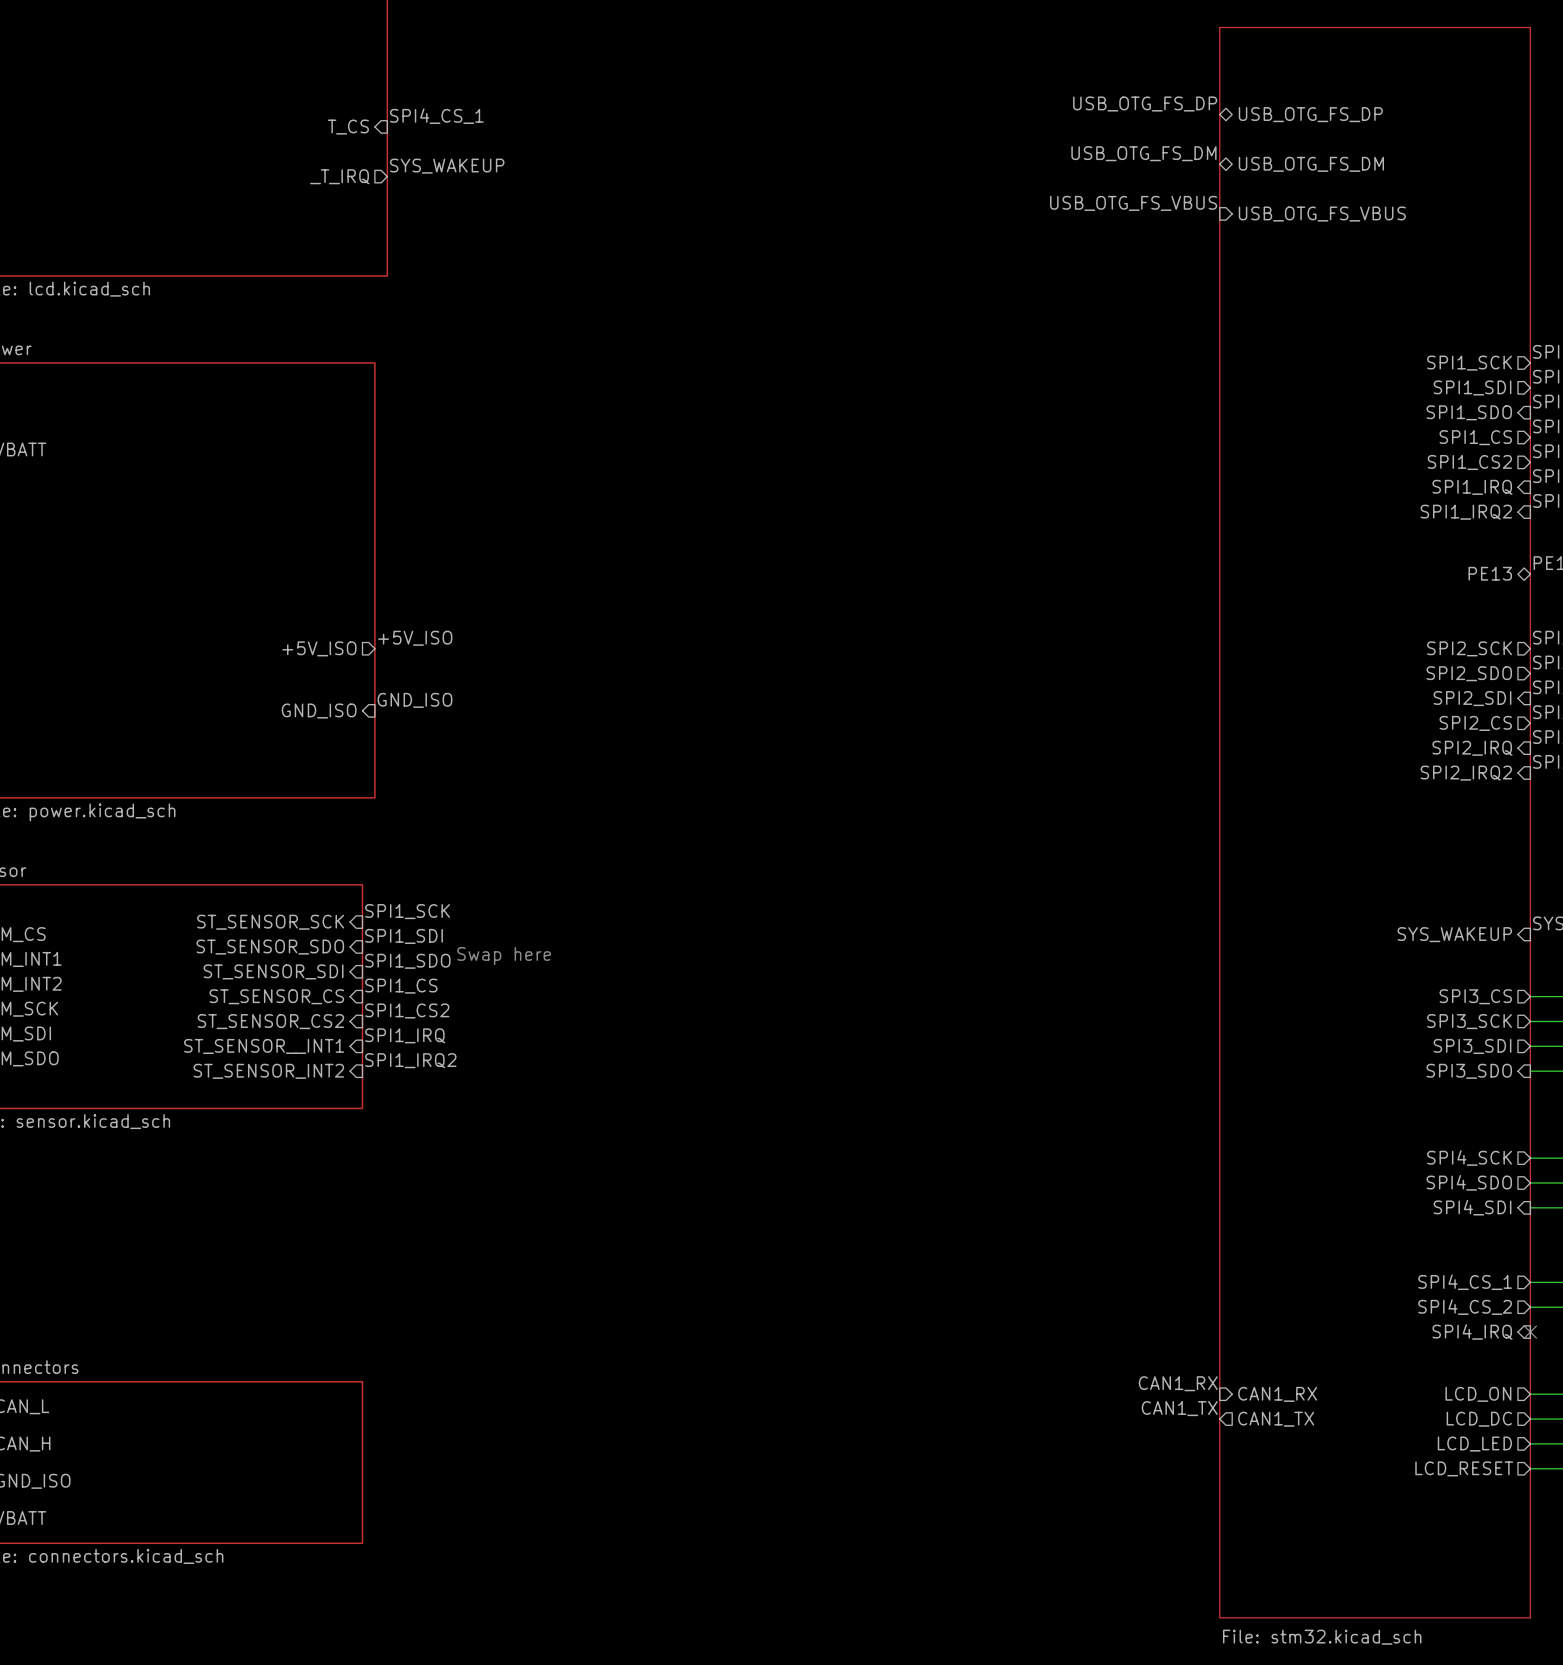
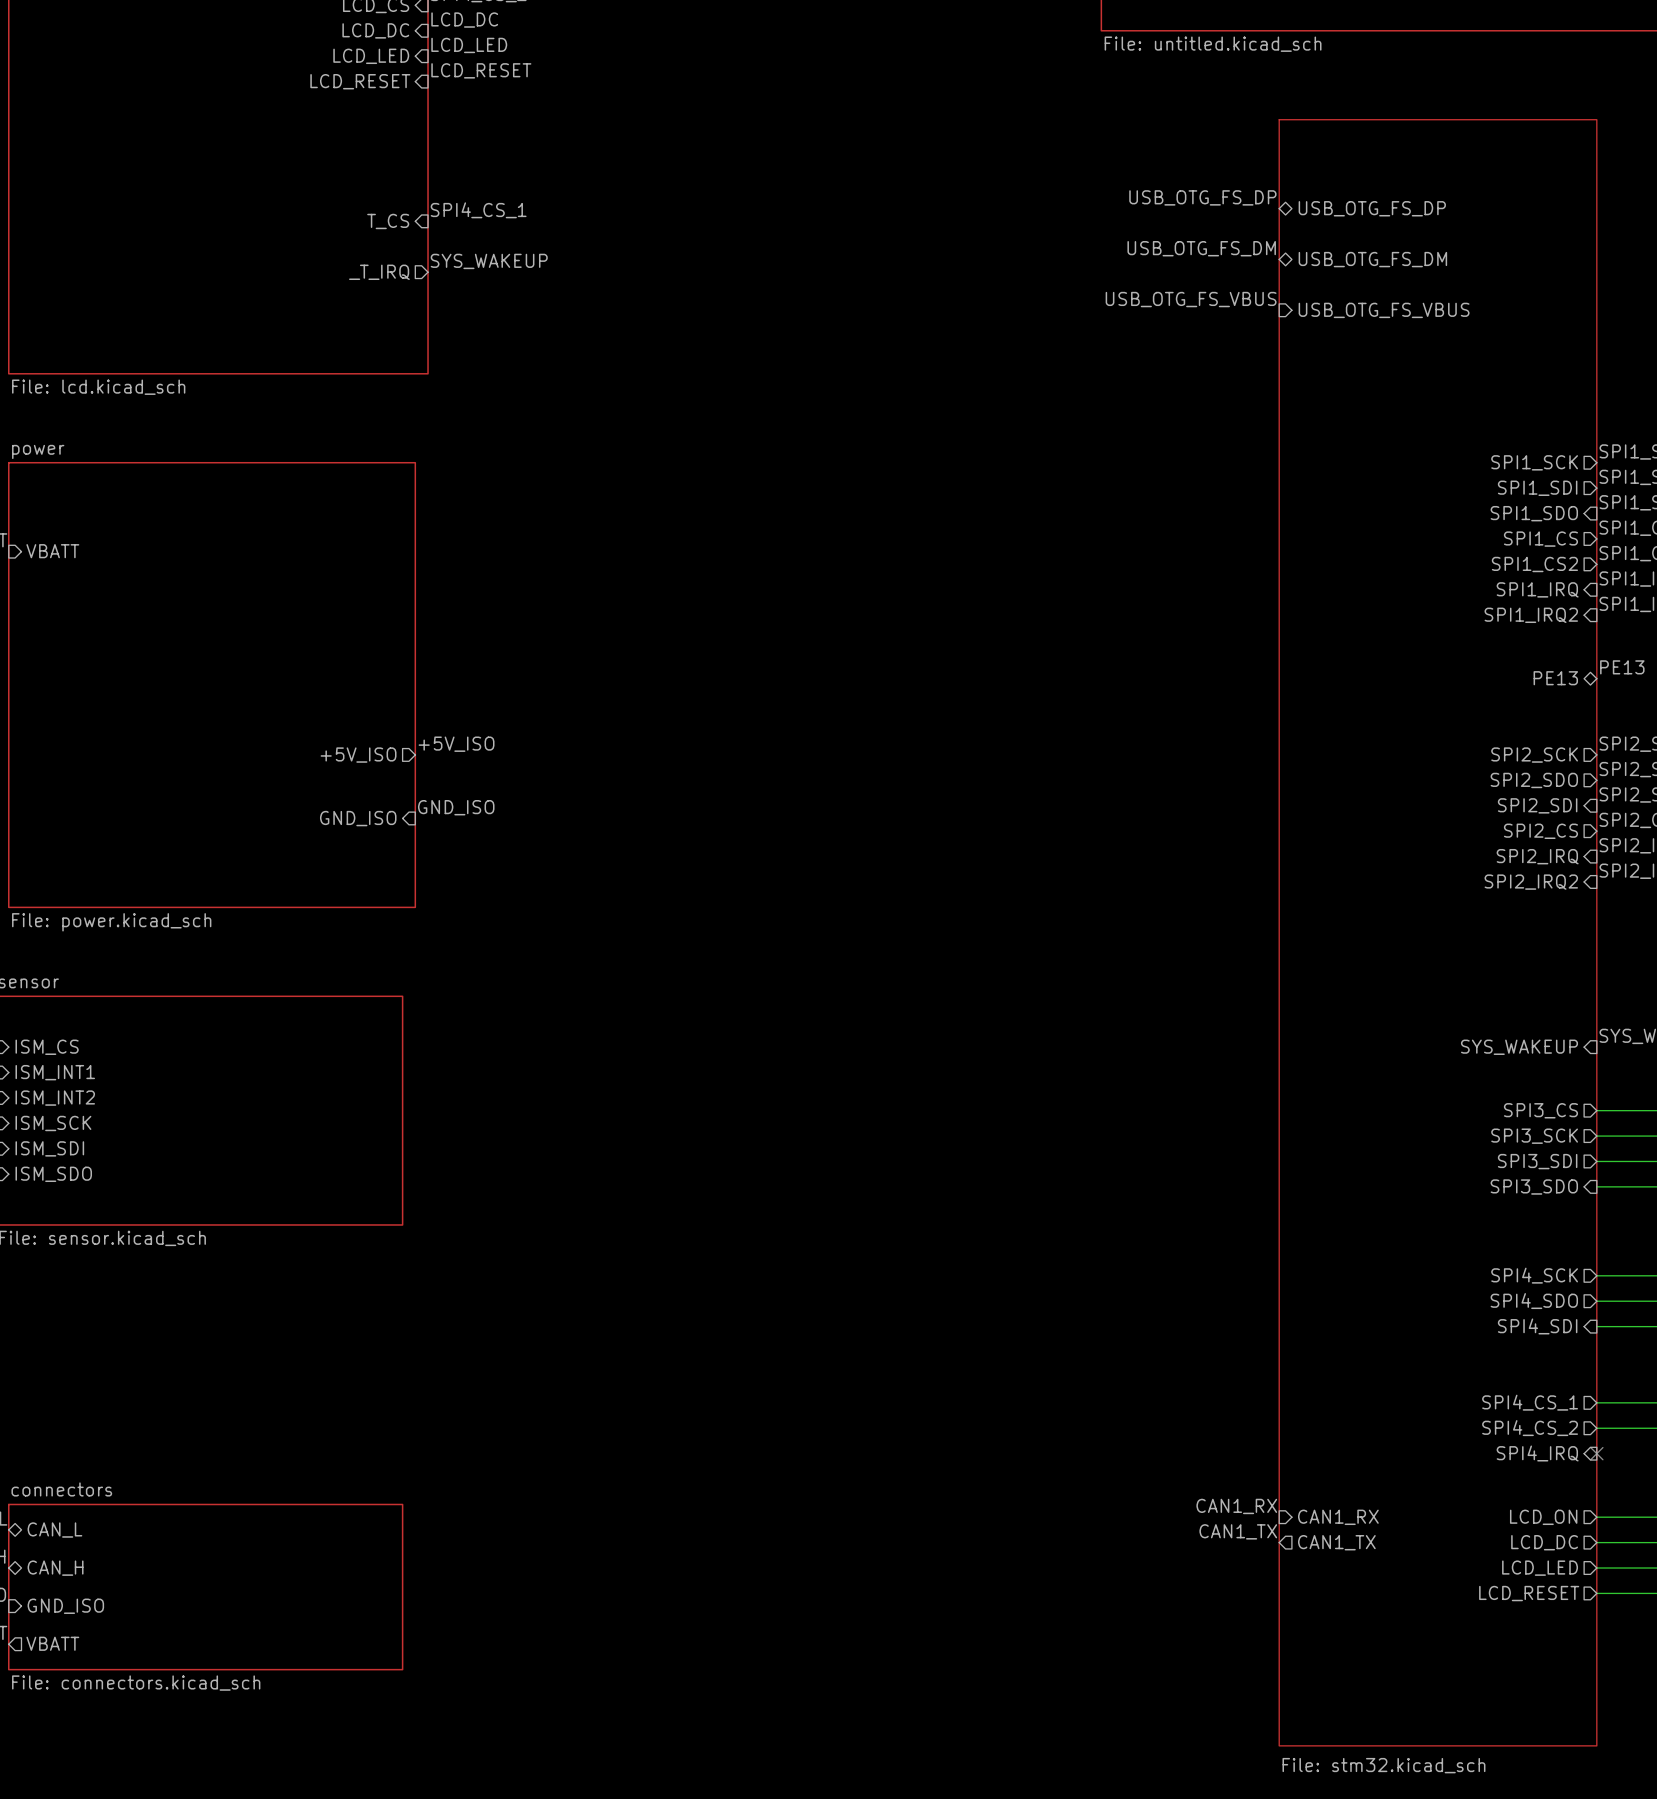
label: SPI1_SCK (407, 911) -> none
sheet pin: ST_SENSOR_SCK (270, 922) -> none
label: SPI1_SDI (404, 936) -> none
sheet pin: ST_SENSOR_SDO (270, 947) -> none
text: Swap here (504, 956) -> none
label: SPI1_SDO (407, 961) -> none
sheet pin: ST_SENSOR_SDI (273, 971) -> none
label: SPI1_CS (401, 986) -> none
sheet pin: ST_SENSOR_CS (276, 996) -> none
label: SPI1_CS2 (407, 1010) -> none
sheet pin: ST_SENSOR_CS2 (270, 1021) -> none
label: SPI1_IRQ (405, 1035) -> none
sheet pin: ST_SENSOR__INT1 (264, 1046) -> none
label: SPI1_IRQ2 (410, 1060) -> none
sheet pin: ST_SENSOR_INT2 (268, 1071) -> none

